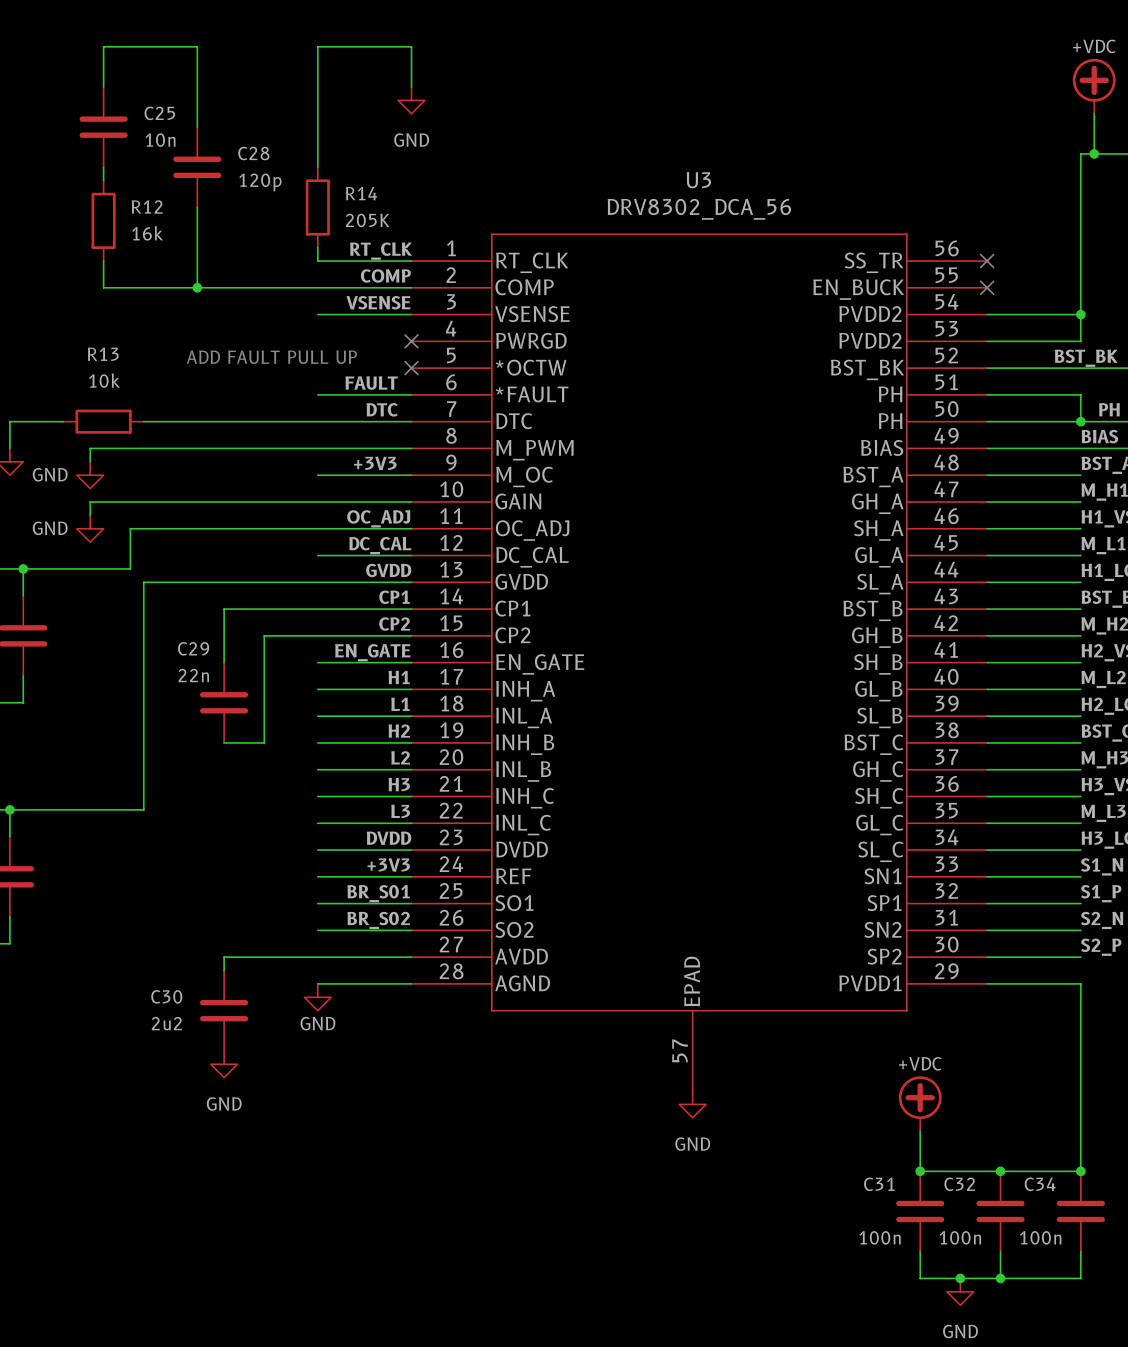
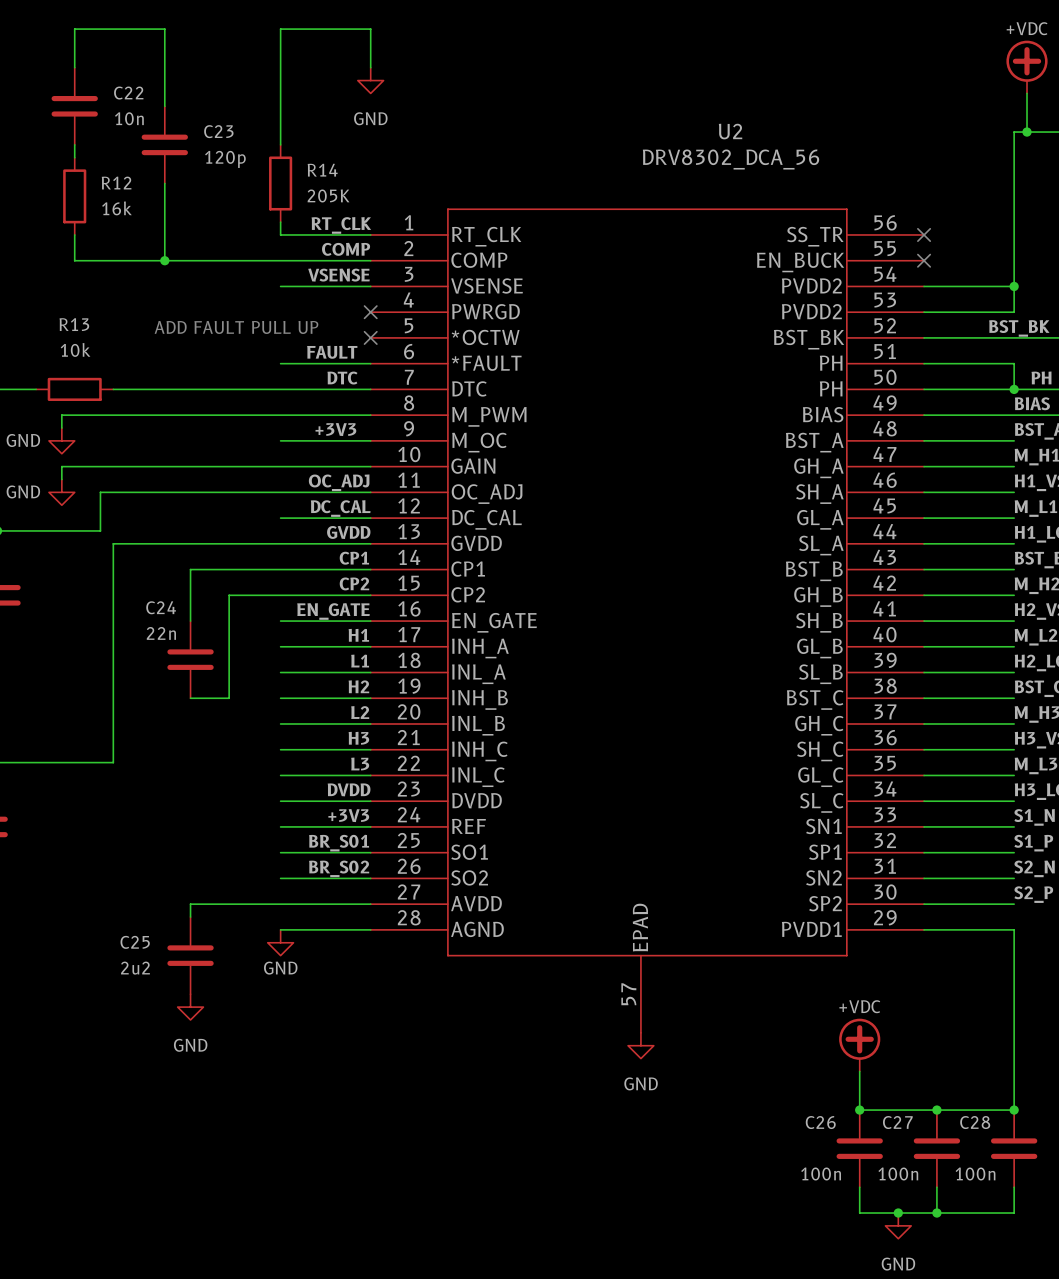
C25 name: C25 (159, 113) -> C22 (128, 93)
C28 name: C28 (253, 153) -> C23 (218, 131)
U3 name: U3 (698, 180) -> U2 (730, 131)
U3 value position: DRV8302_DCA_56 (699, 209) -> DRV8302_DCA_56 (731, 159)
C29 name: C29 (193, 648) -> C24 (161, 607)
C30 name: C30 (166, 996) -> C25 (135, 942)
C31 name: C31 (879, 1184) -> C26 (820, 1122)
C32 name: C32 (959, 1184) -> C27 (897, 1122)
C34 name: C34 (1040, 1184) -> C28 (975, 1122)

